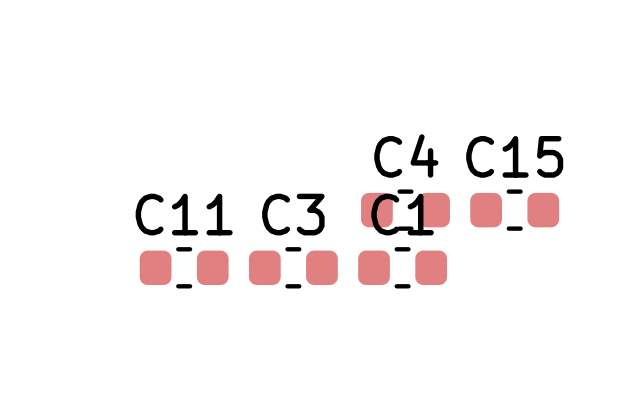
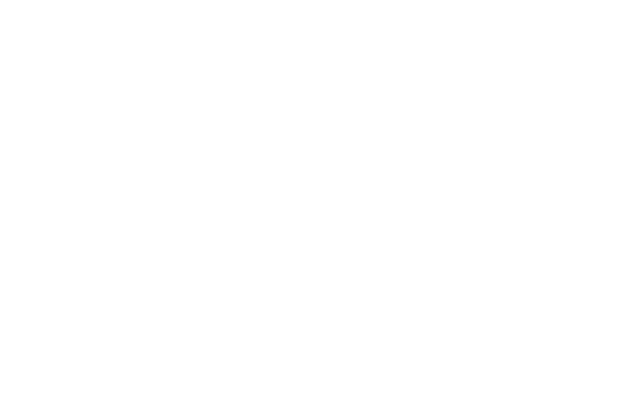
C4: (405, 210) -> none
C15: (514, 210) -> none
C11: (184, 267) -> none
C3: (293, 267) -> none
C1: (402, 267) -> none

